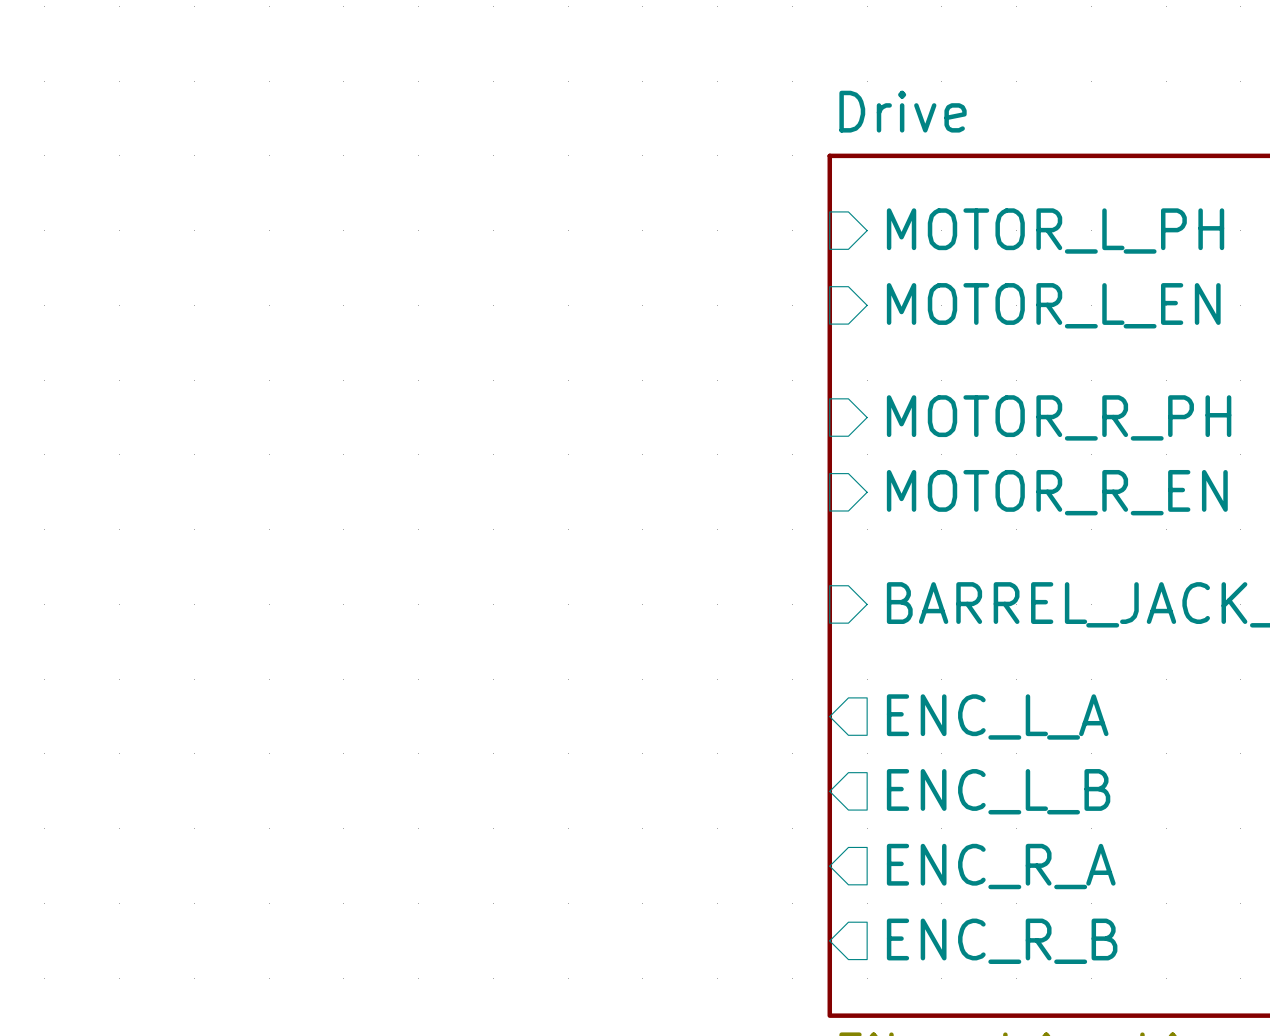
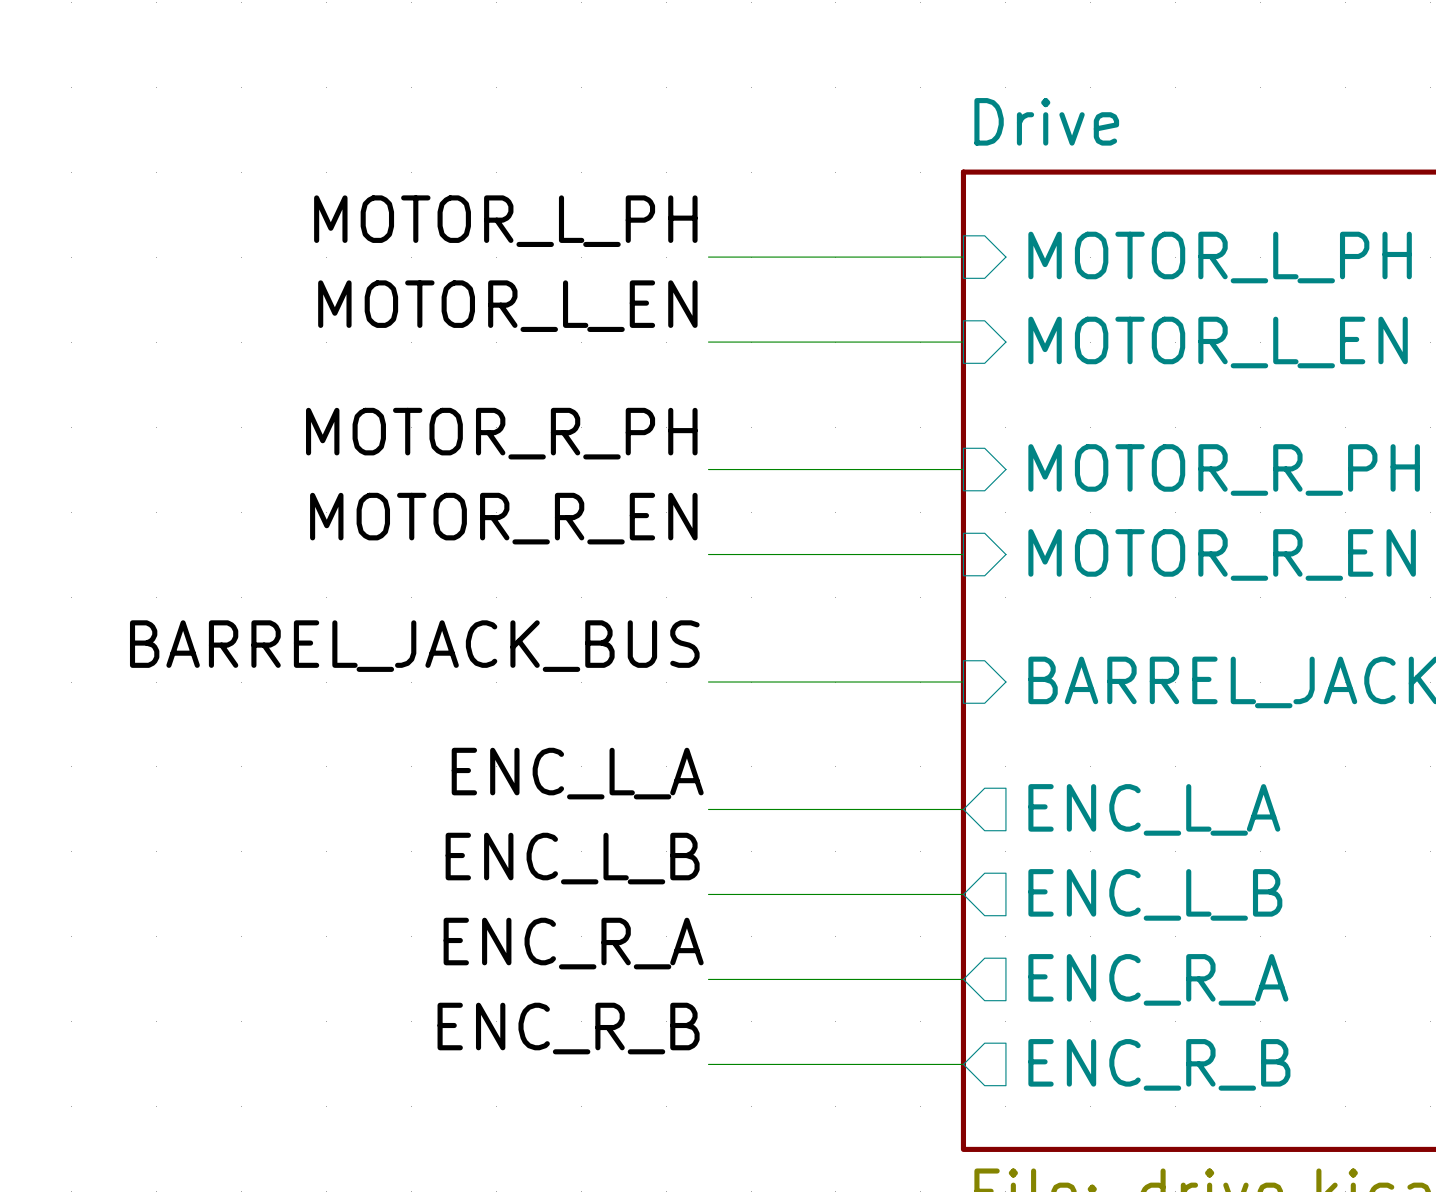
label: none -> MOTOR_L_PH (505, 221)
wire: none -> (708, 257) (963, 257)
label: none -> MOTOR_L_EN (507, 306)
wire: none -> (708, 342) (963, 342)
label: none -> MOTOR_R_PH (501, 433)
wire: none -> (708, 469) (963, 469)
label: none -> MOTOR_R_EN (503, 518)
wire: none -> (708, 554) (963, 554)
label: none -> BARREL_JACK_BUS (414, 646)
wire: none -> (708, 682) (963, 682)
label: none -> ENC_L_A (577, 773)
wire: none -> (708, 809) (963, 809)
label: none -> ENC_L_B (572, 858)
wire: none -> (708, 894) (963, 894)
label: none -> ENC_R_A (573, 943)
wire: none -> (708, 979) (963, 979)
label: none -> ENC_R_B (568, 1028)
wire: none -> (708, 1064) (963, 1064)

